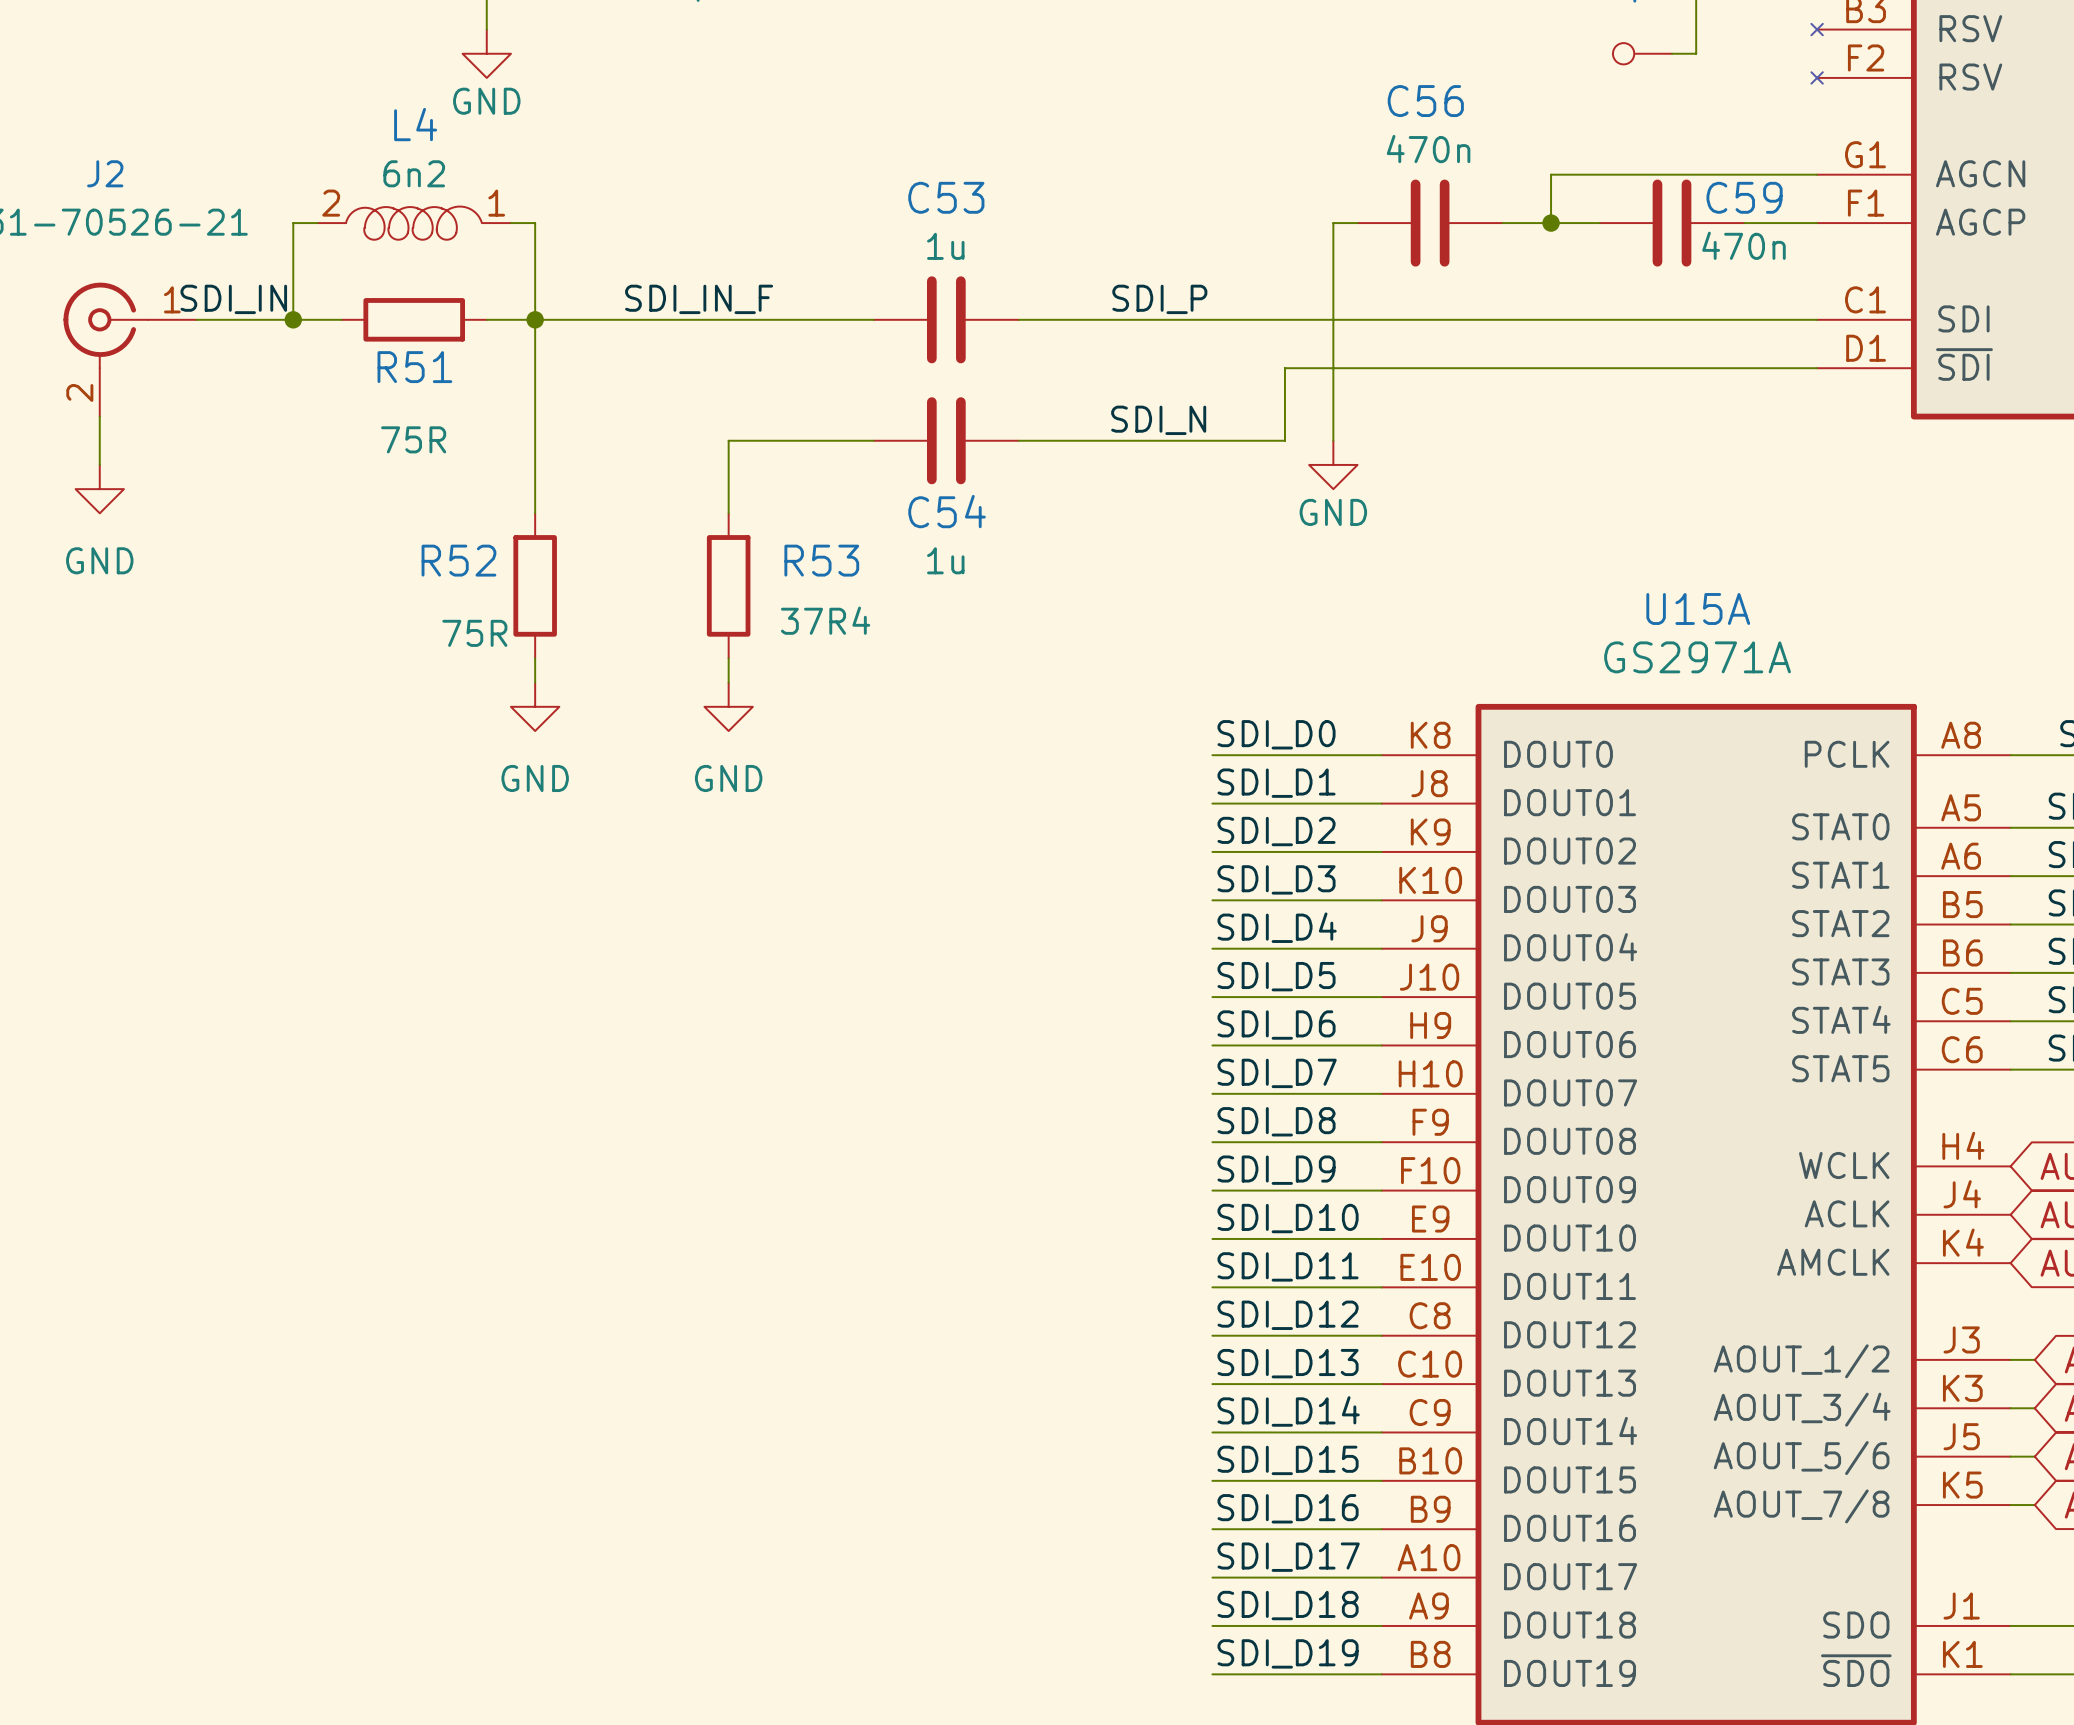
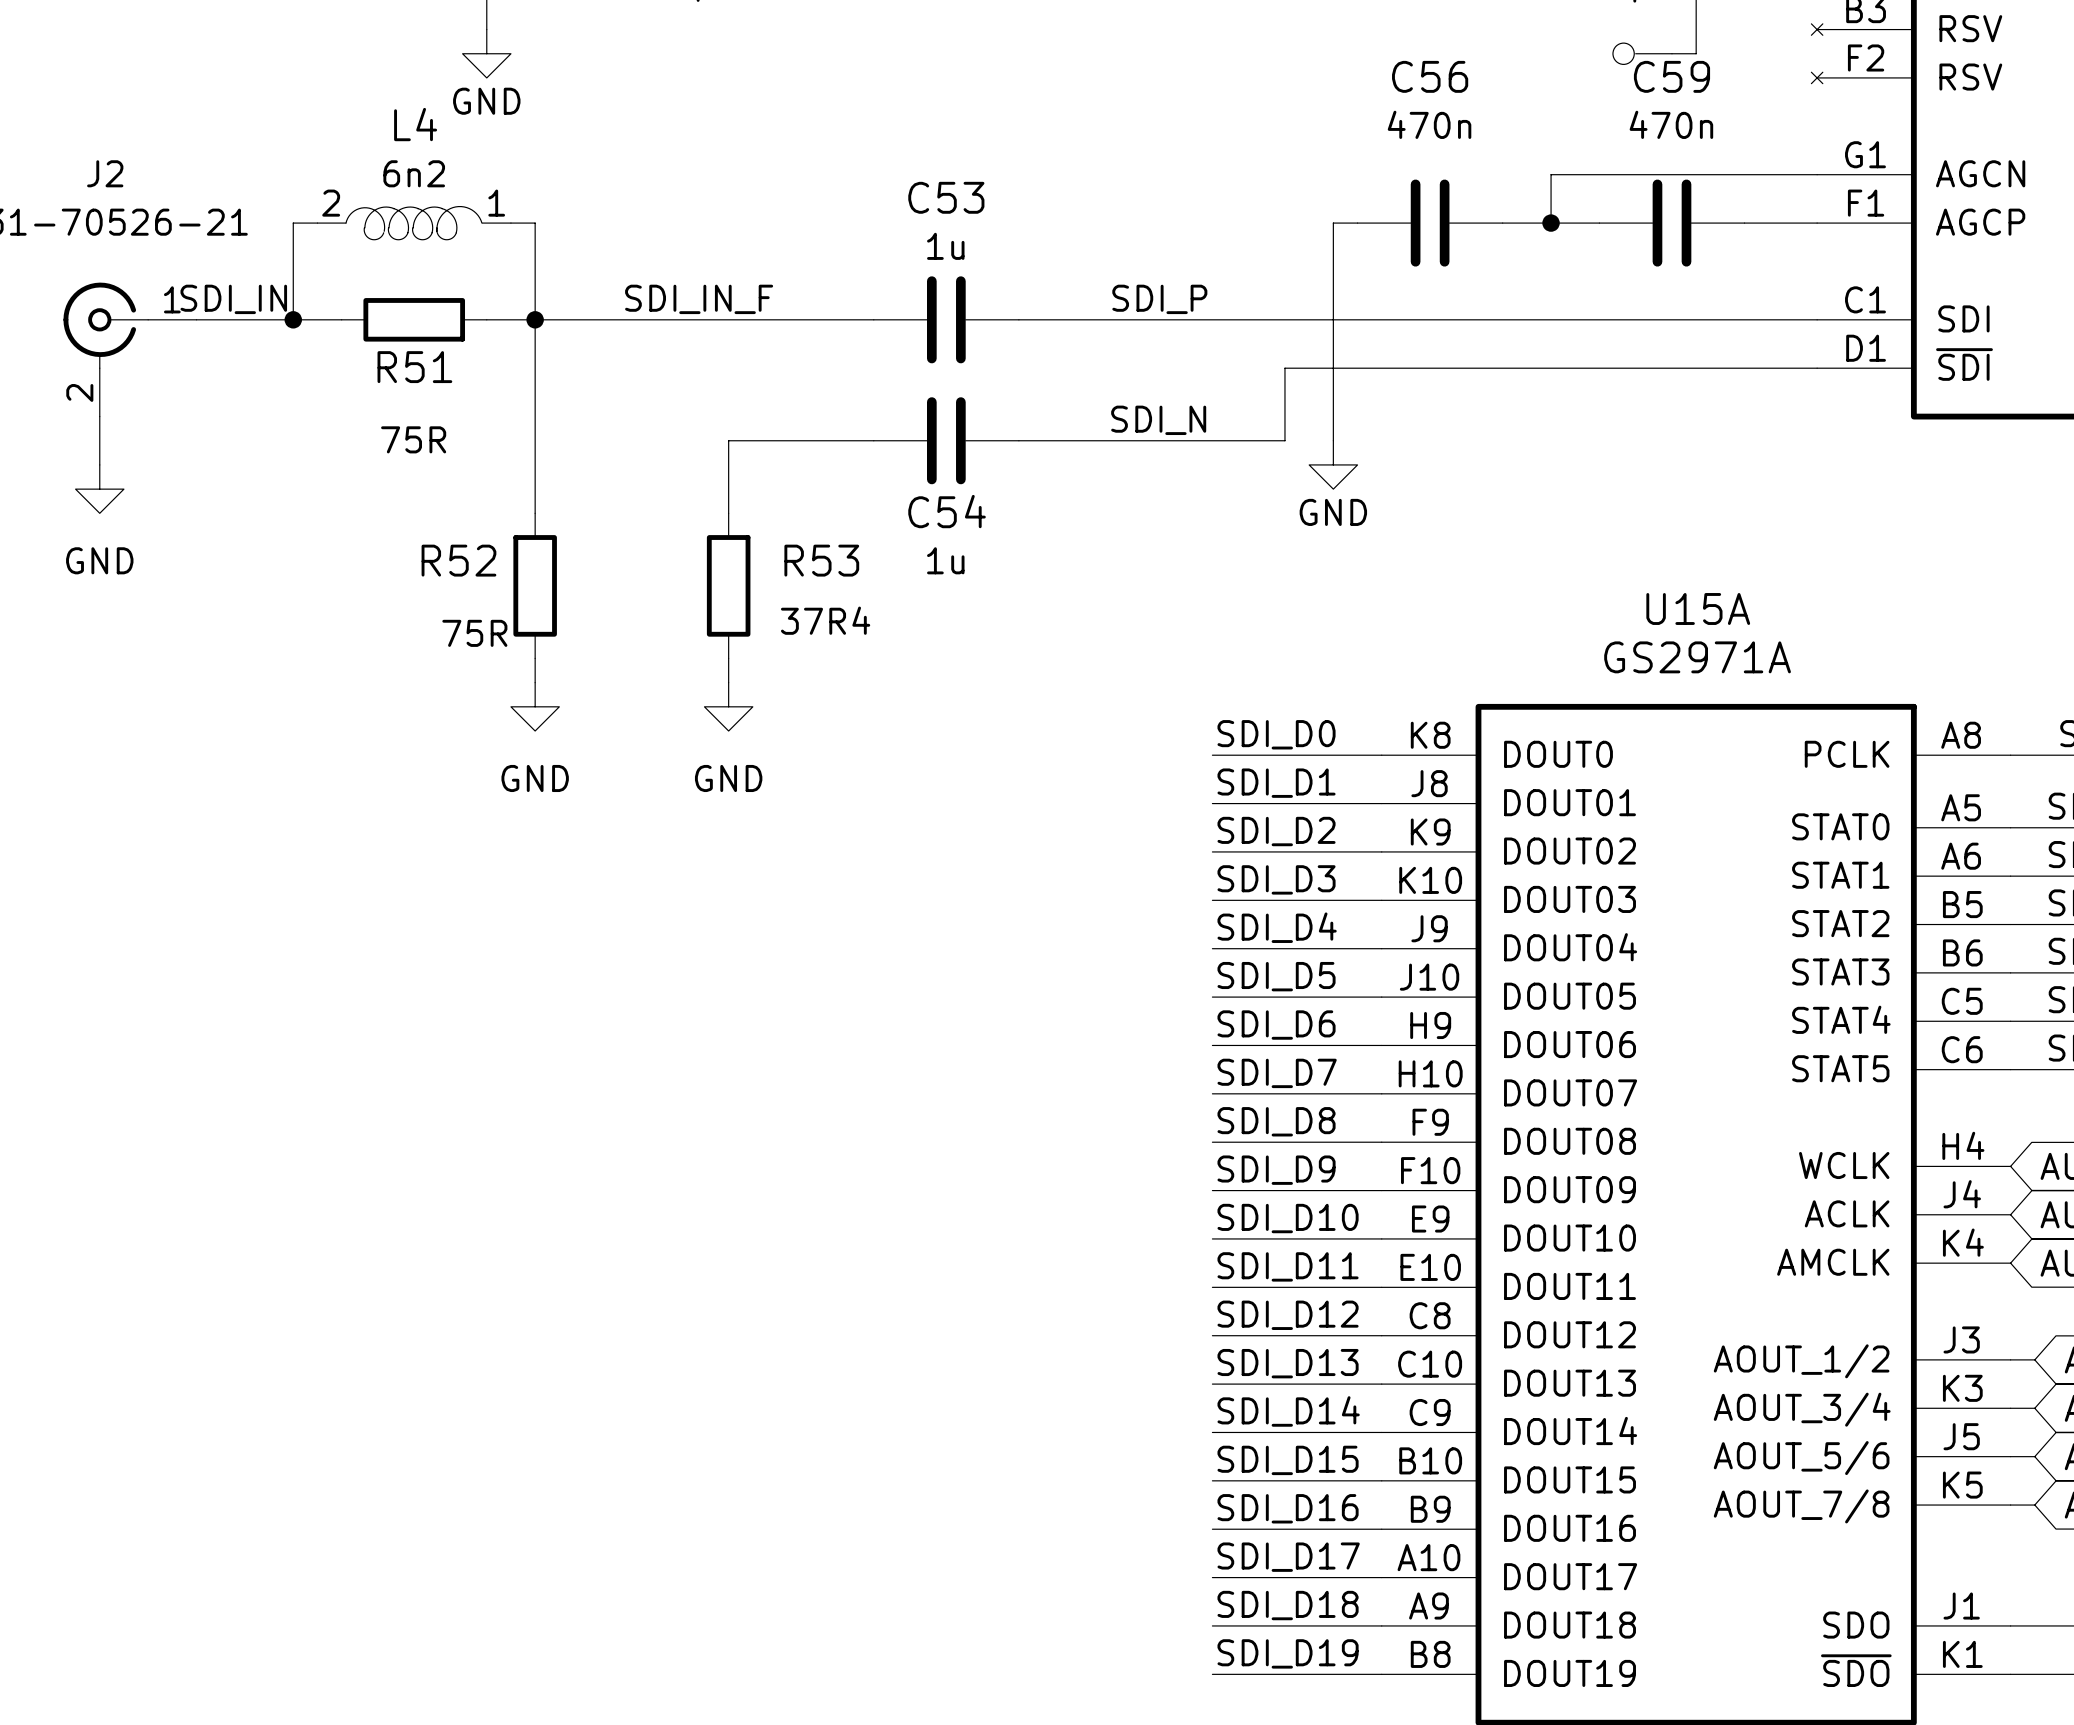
C56 name position: C56 (1425, 101) -> C56 (1430, 76)
C56 text position: 470n (1428, 149) -> 470n (1429, 124)
C59 name position: C59 (1744, 197) -> C59 (1671, 76)
C59 text position: 470n (1743, 245) -> 470n (1671, 124)

